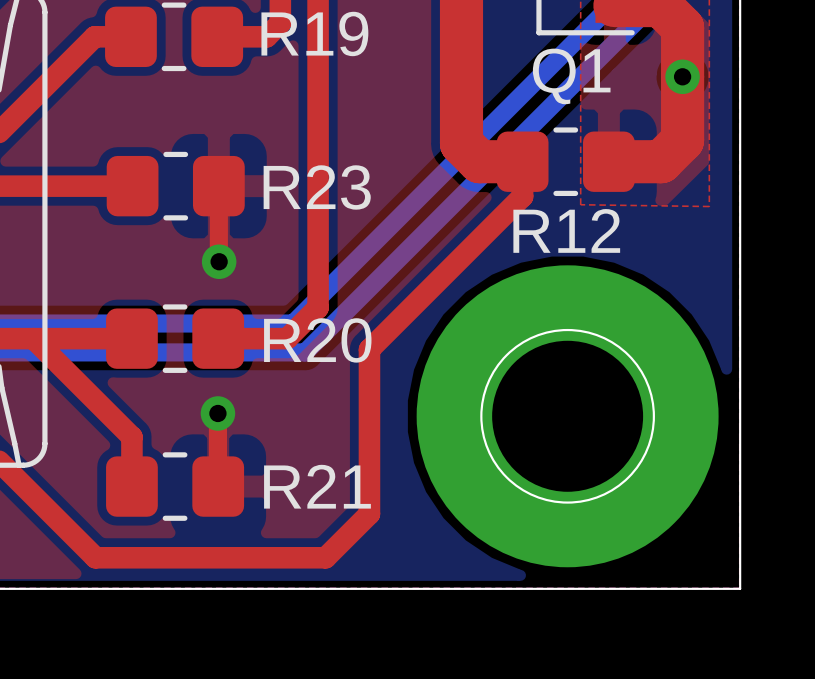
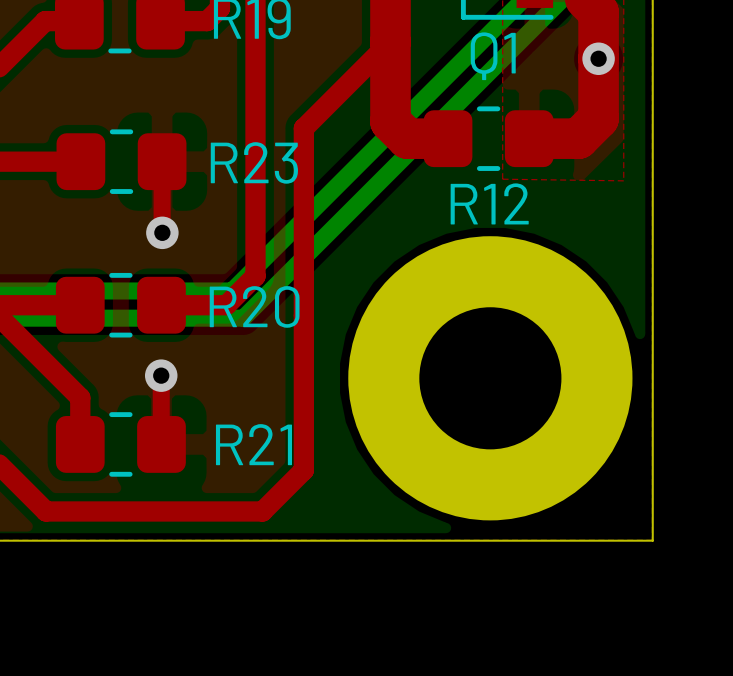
top track: (522, 161) (522, 196) (369, 349) -> (390, 41) (303, 128) (303, 315)

